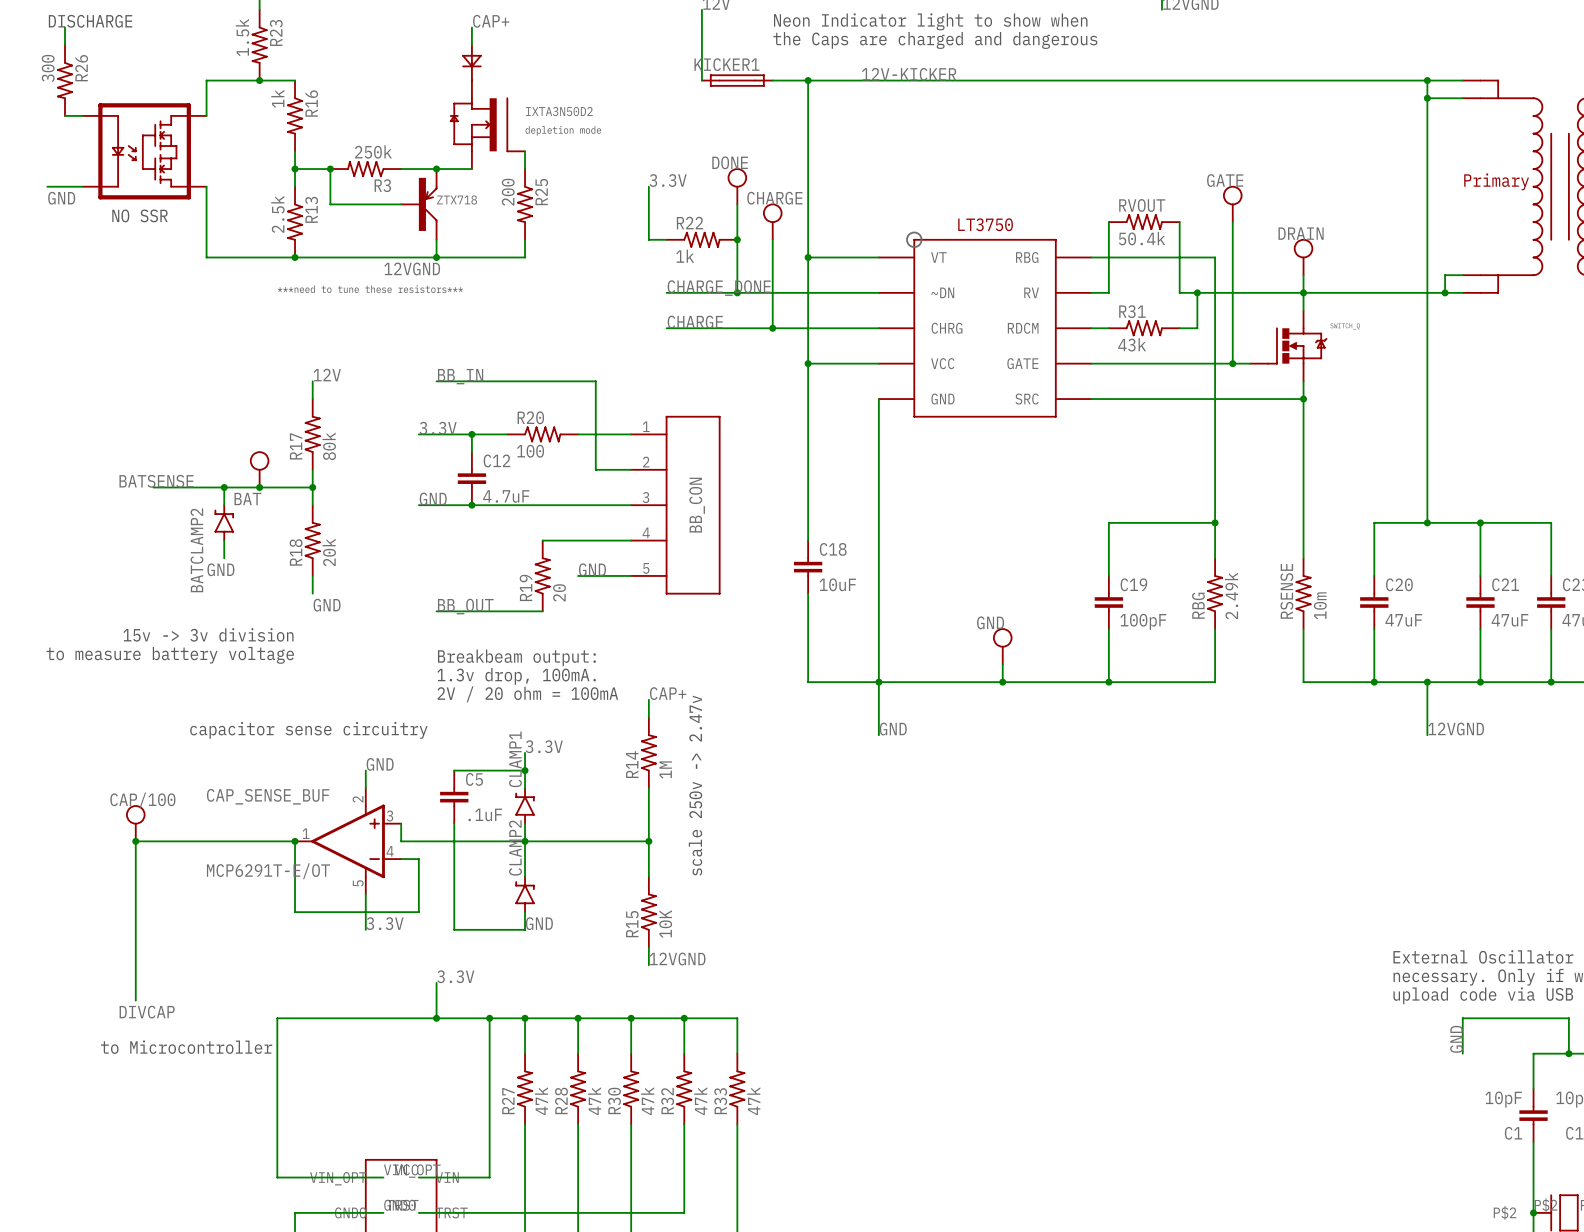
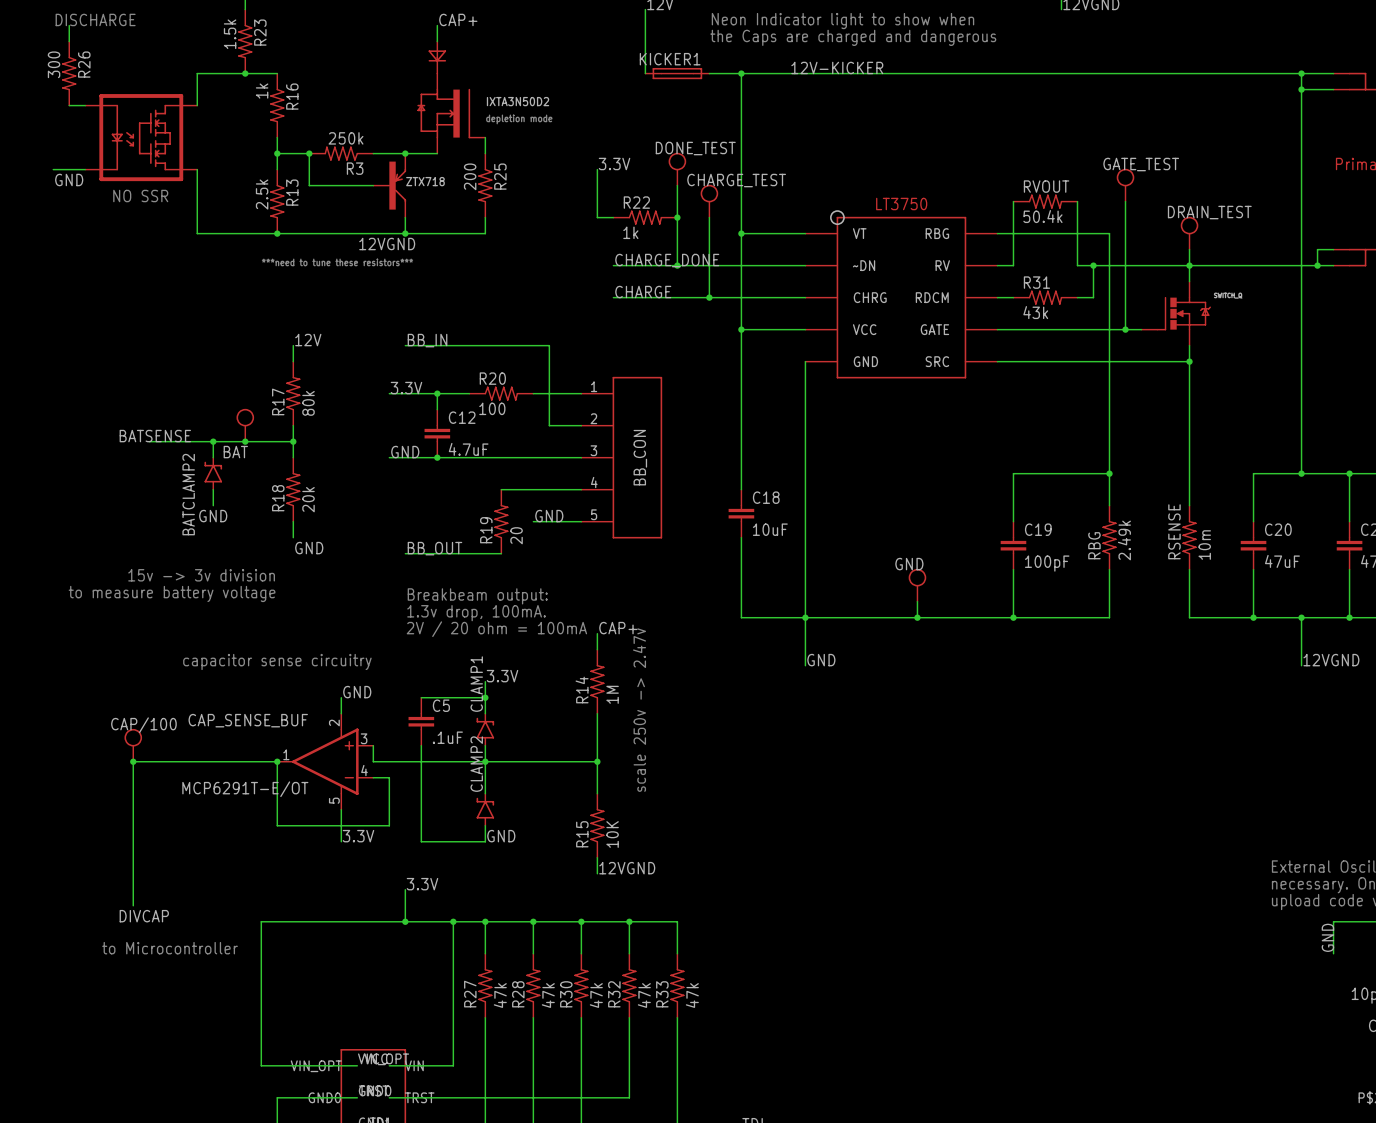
DONE name: DONE (730, 162) -> DONE_TEST (695, 148)
GATE name: GATE (1225, 180) -> GATE_TEST (1141, 164)
CHARGE name: CHARGE (774, 198) -> CHARGE_TEST (736, 180)
DRAIN name: DRAIN (1301, 233) -> DRAIN_TEST (1209, 212)

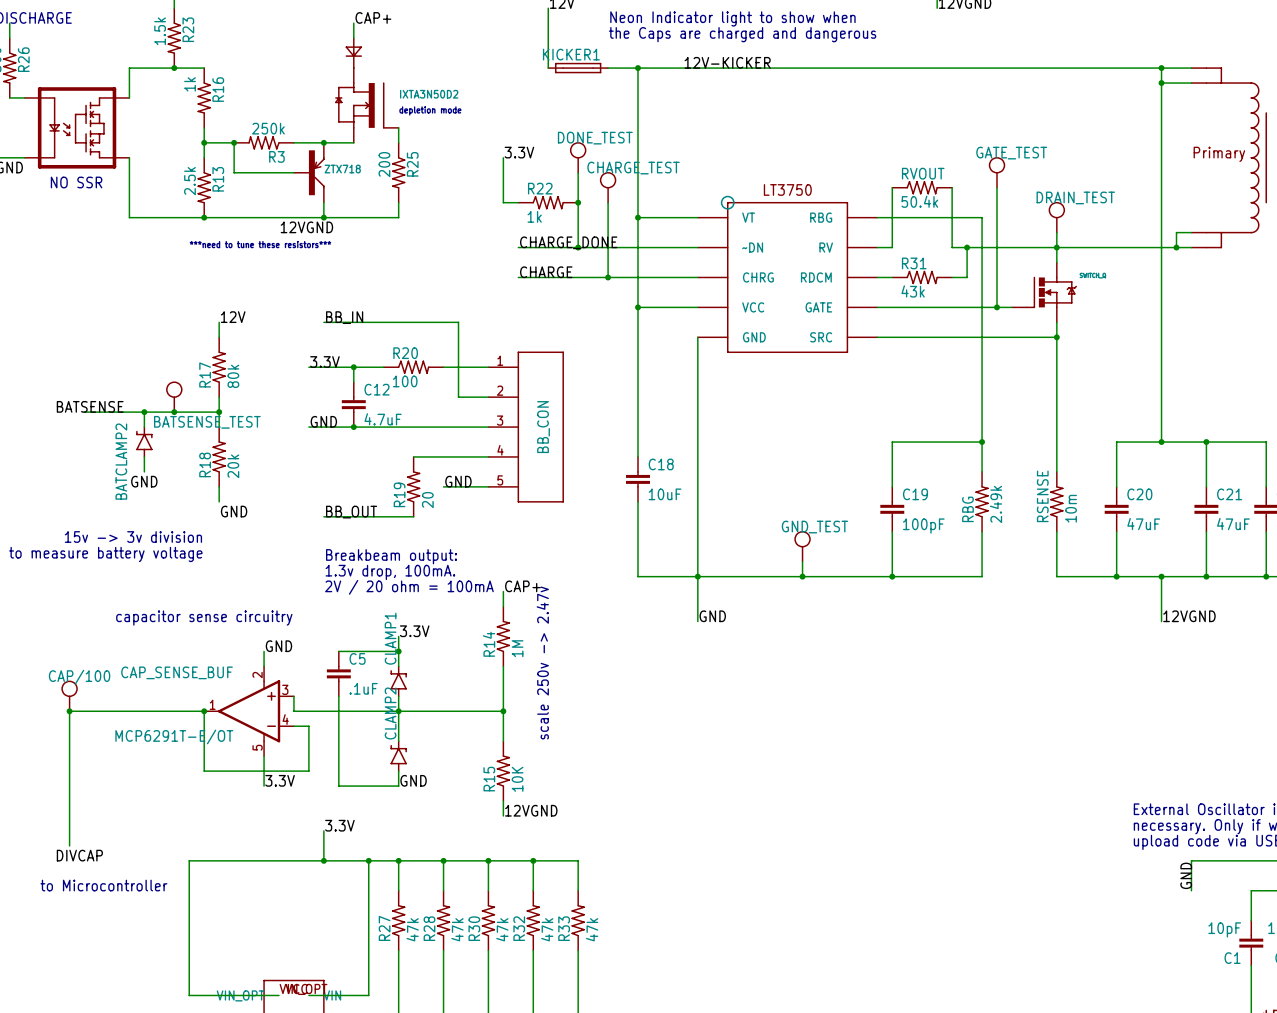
BAT name: BAT (235, 452) -> BATSENSE_TEST (207, 422)
GND name: GND (909, 564) -> GND_TEST (814, 527)

